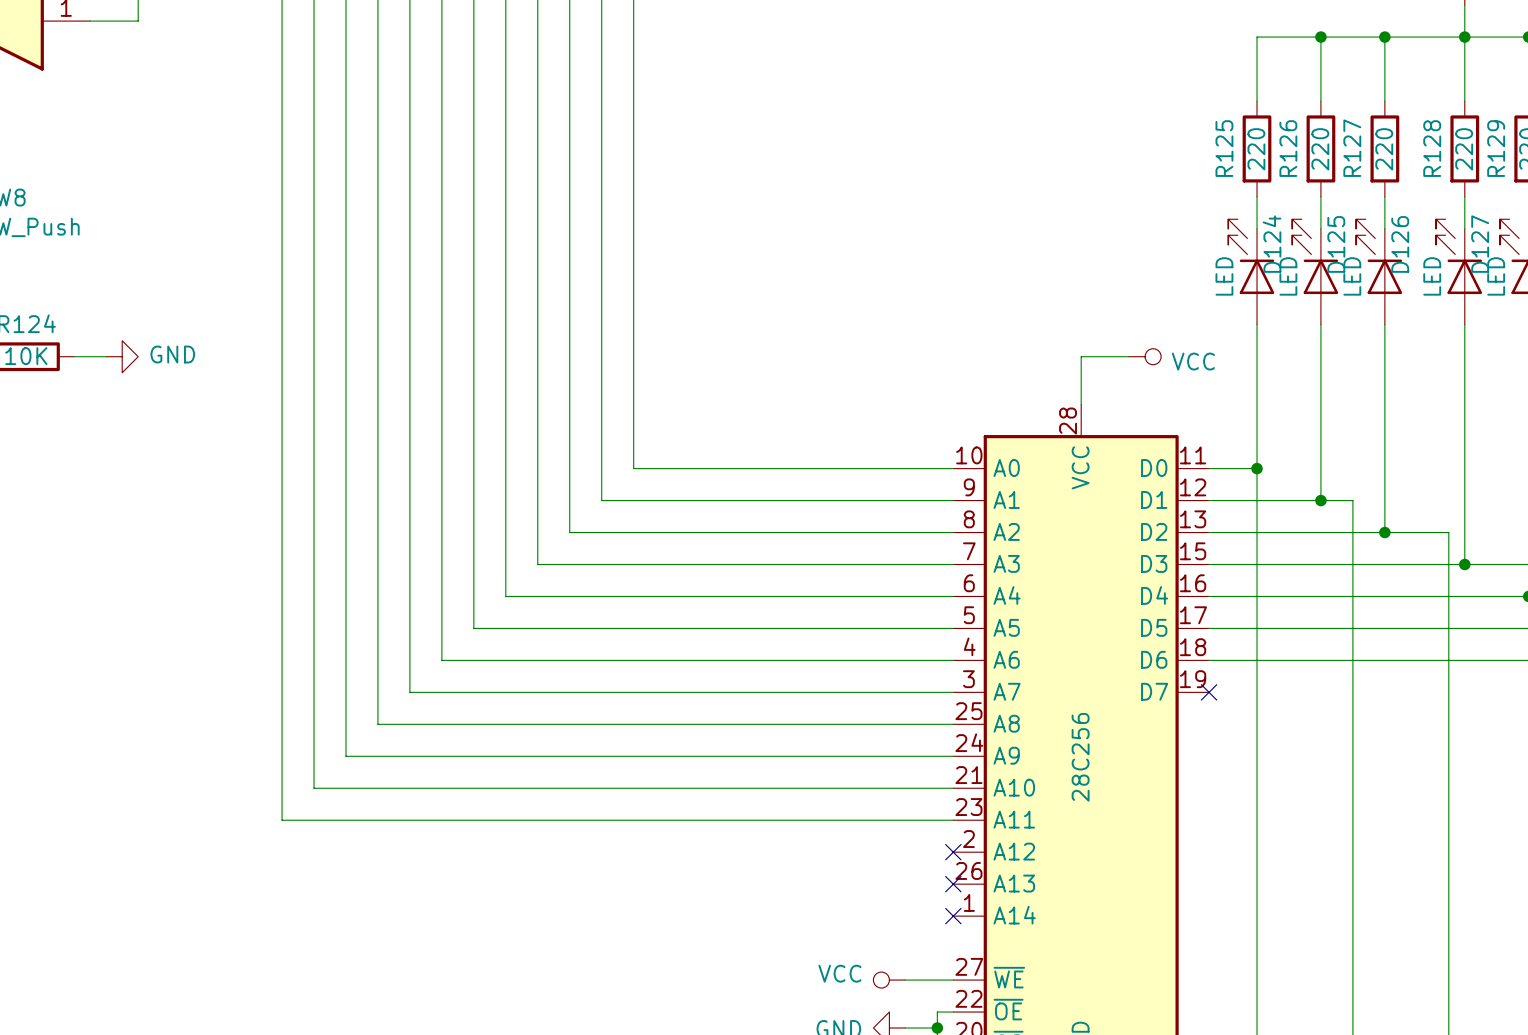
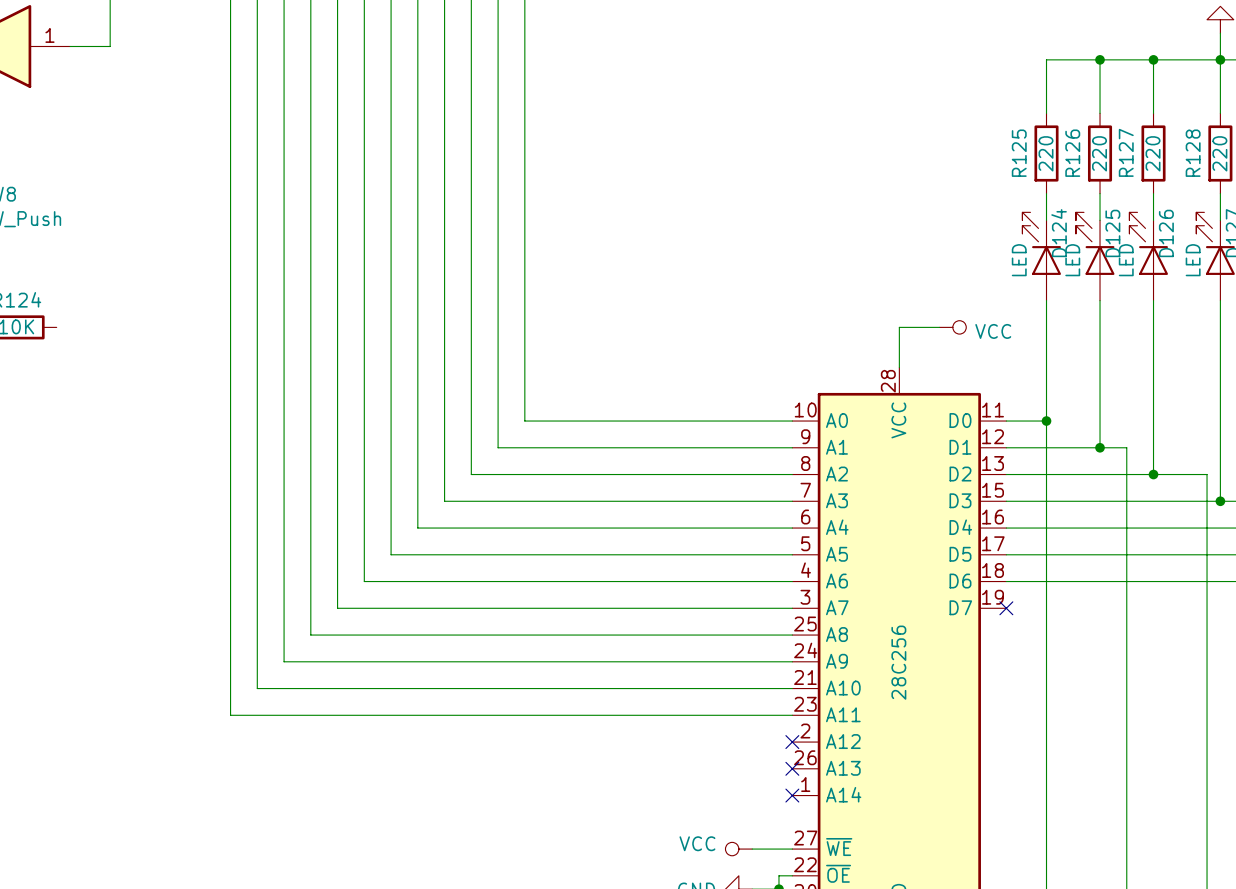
wire: (74, 356) (106, 356) -> none
power symbol: GND (122, 356) -> none

